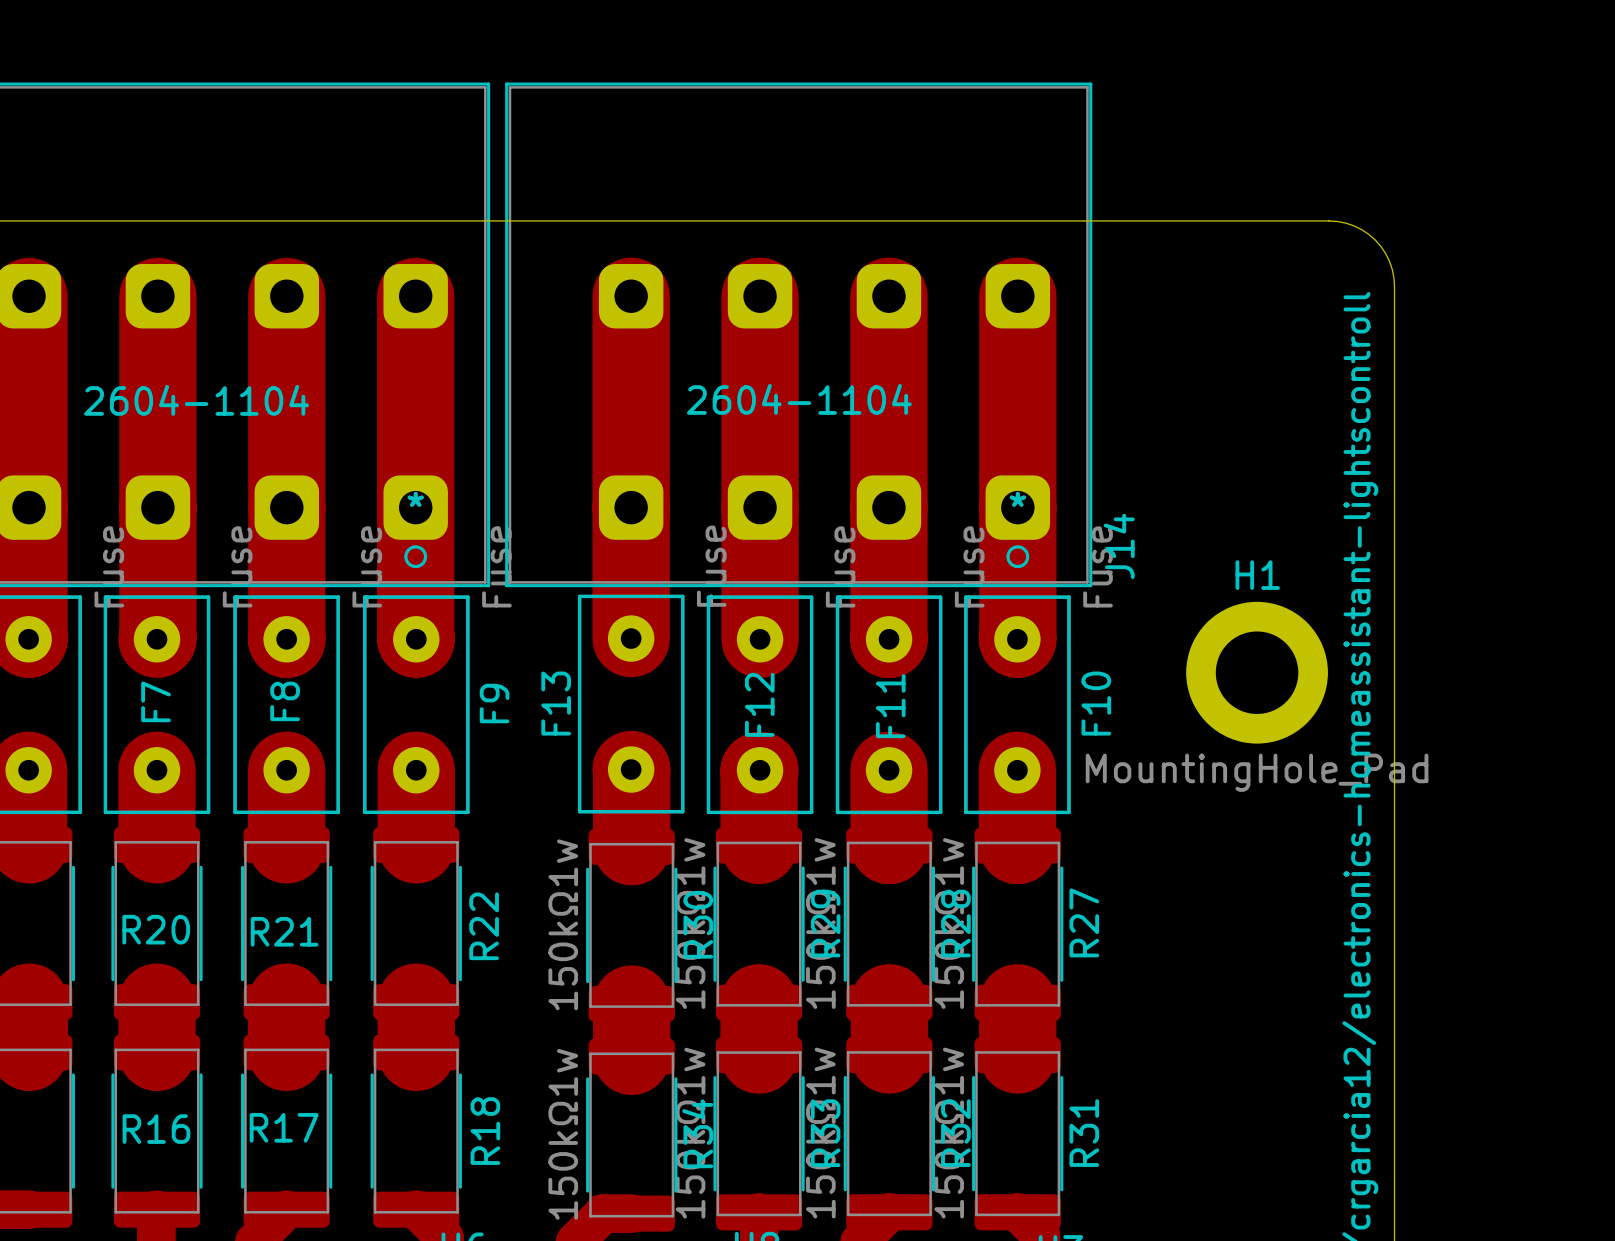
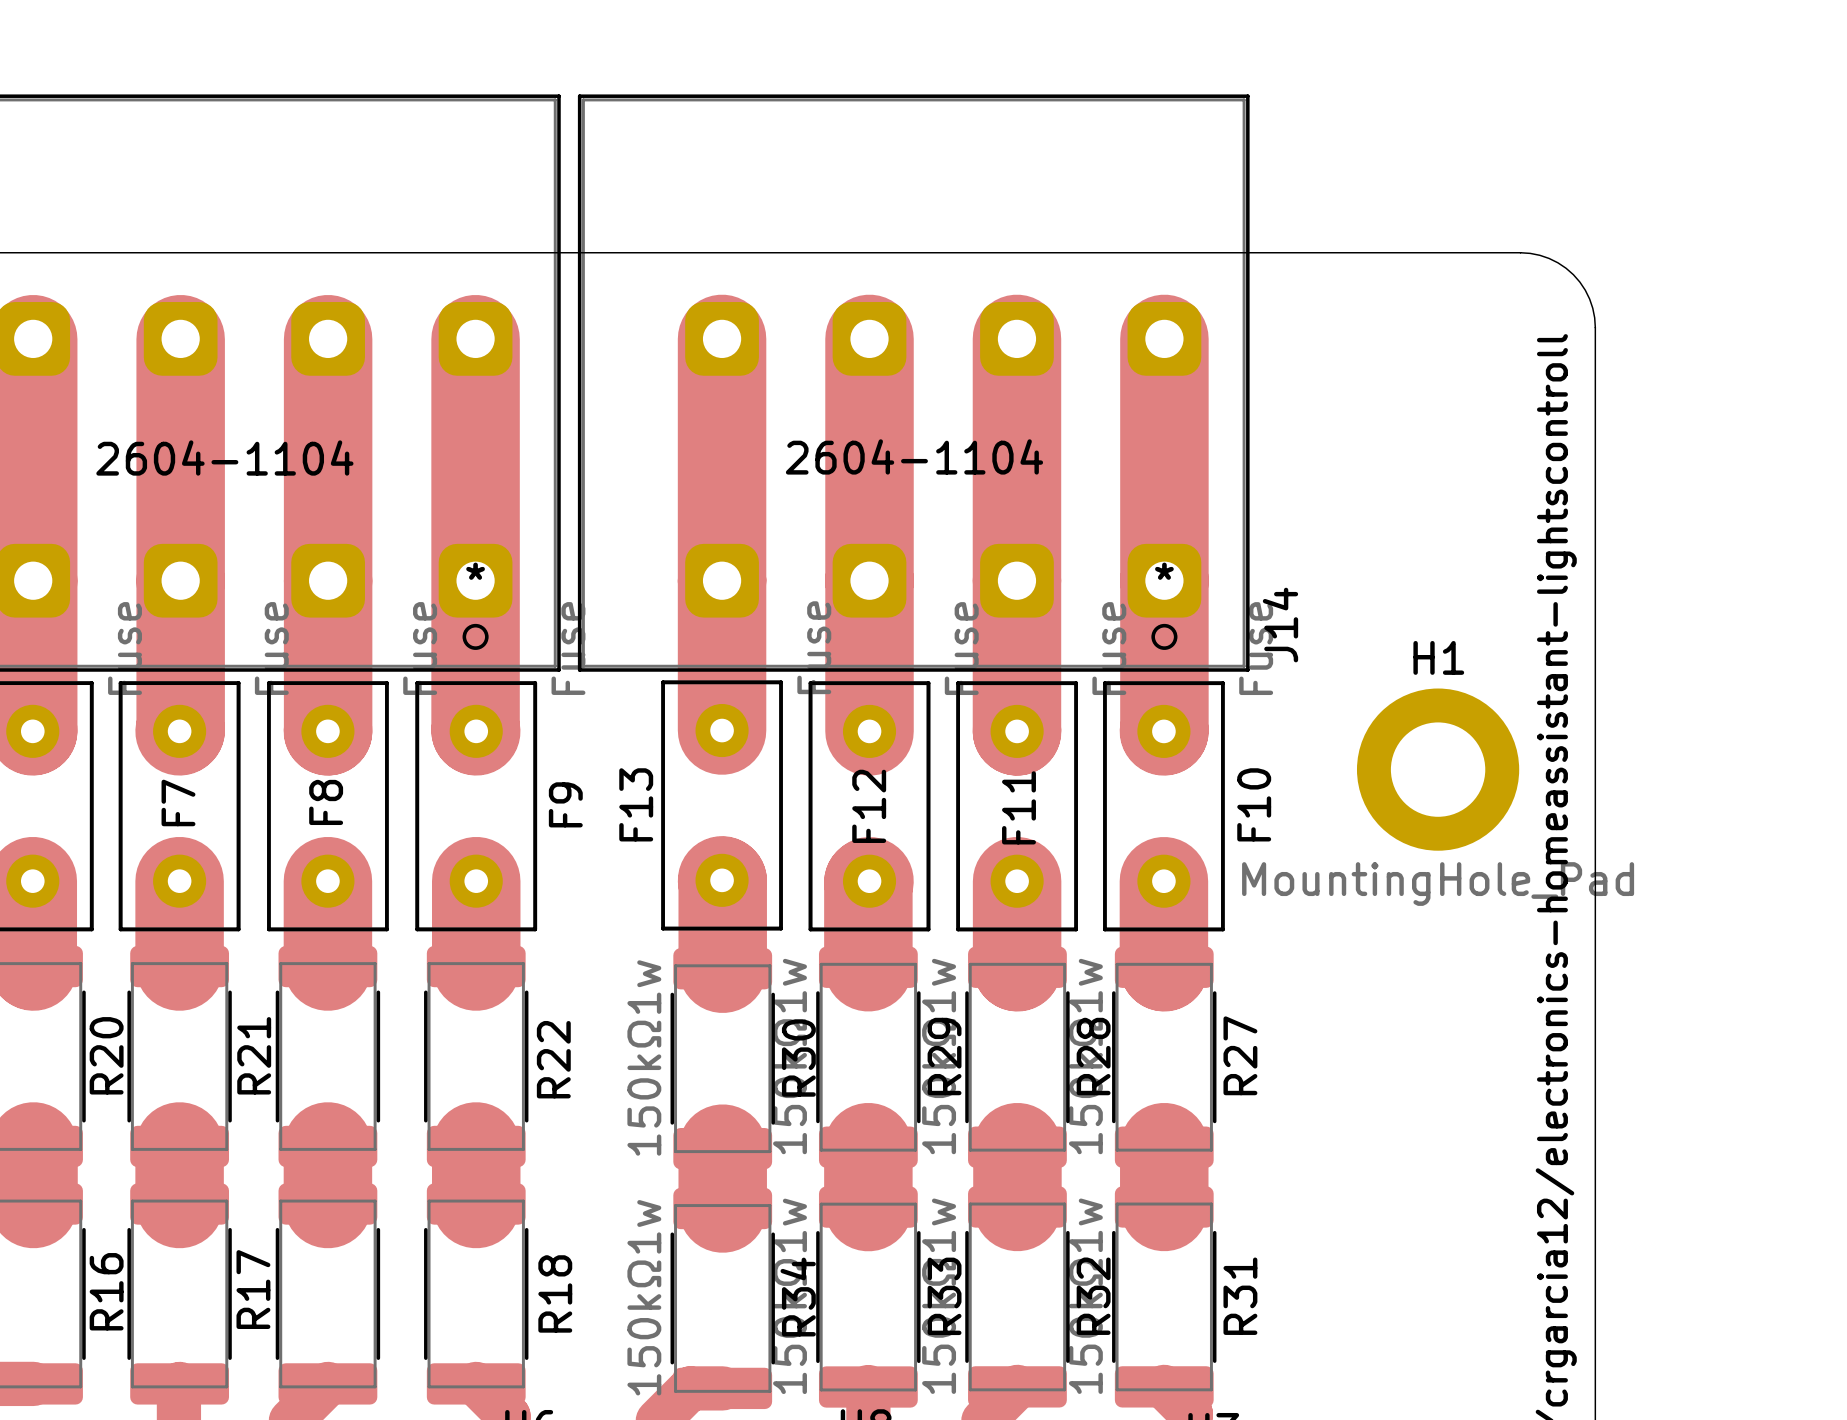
R20 name rotation: 0° (156, 929) -> 90° counterclockwise (106, 1055)
R21 name rotation: 0° (284, 931) -> 90° counterclockwise (254, 1055)
R17 name rotation: 0° (284, 1127) -> 90° counterclockwise (253, 1289)
R16 name rotation: 0° (156, 1129) -> 90° counterclockwise (106, 1291)

